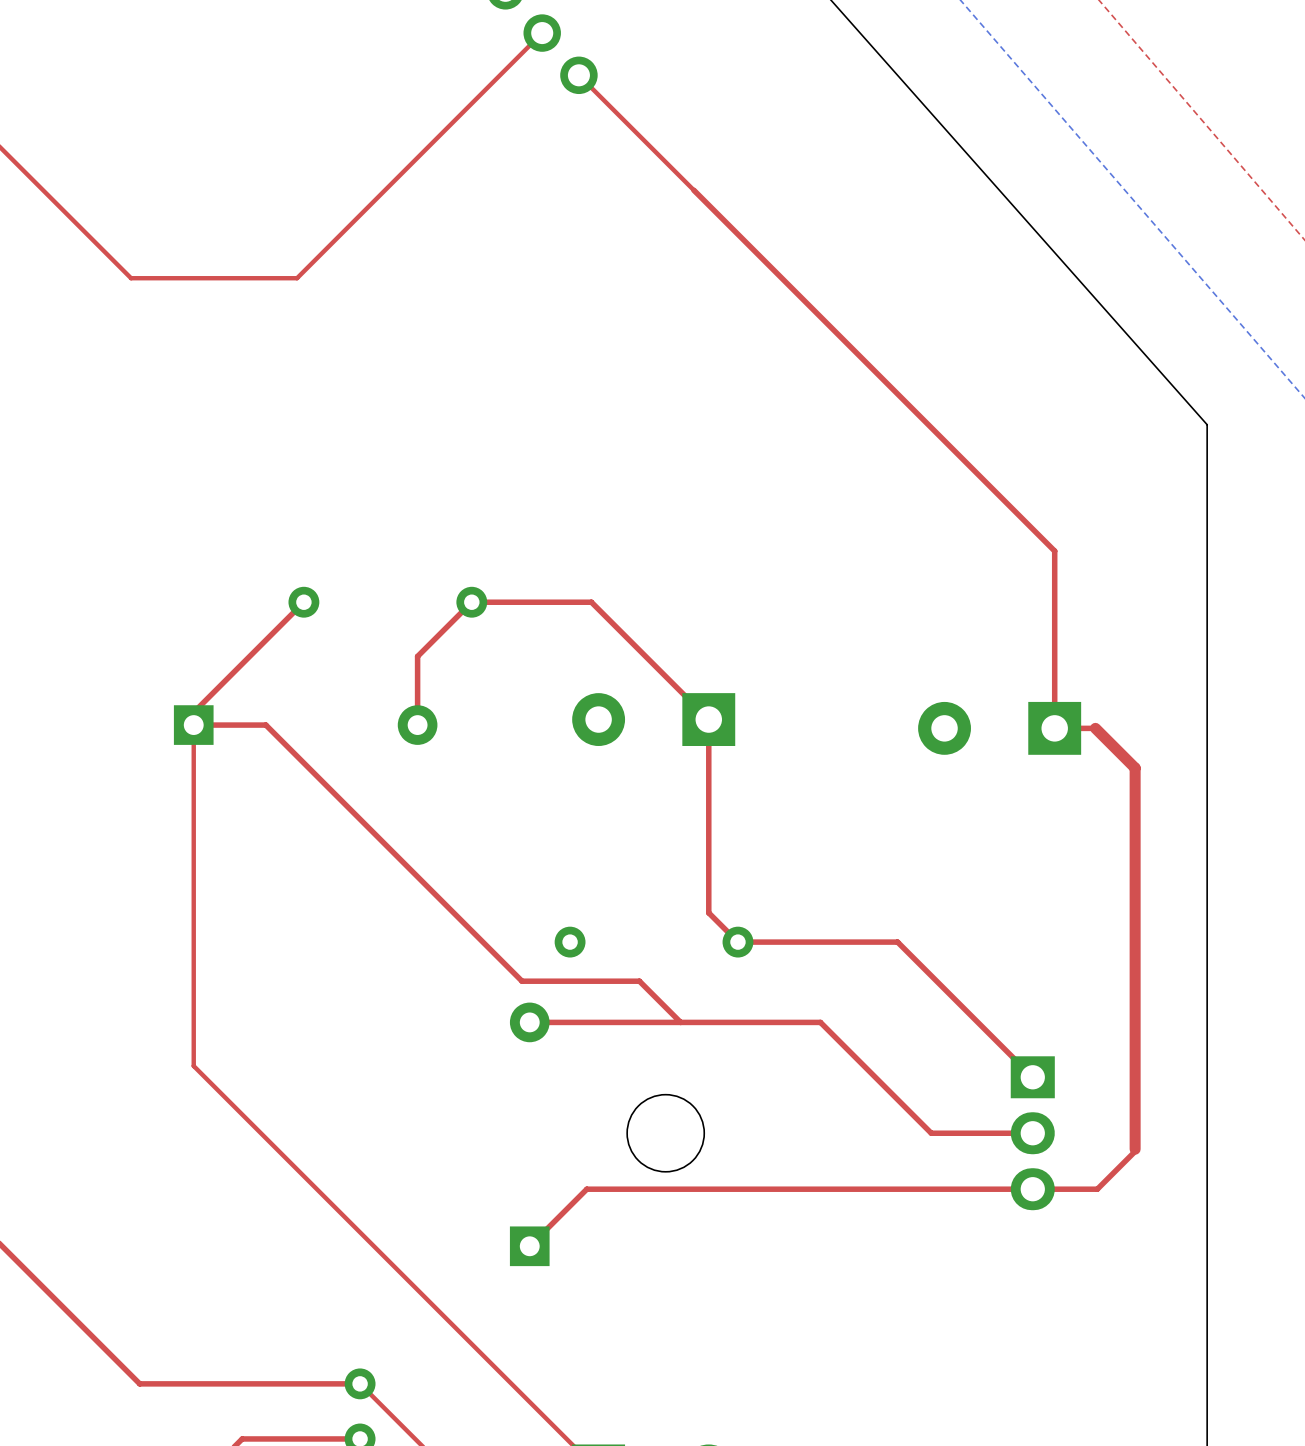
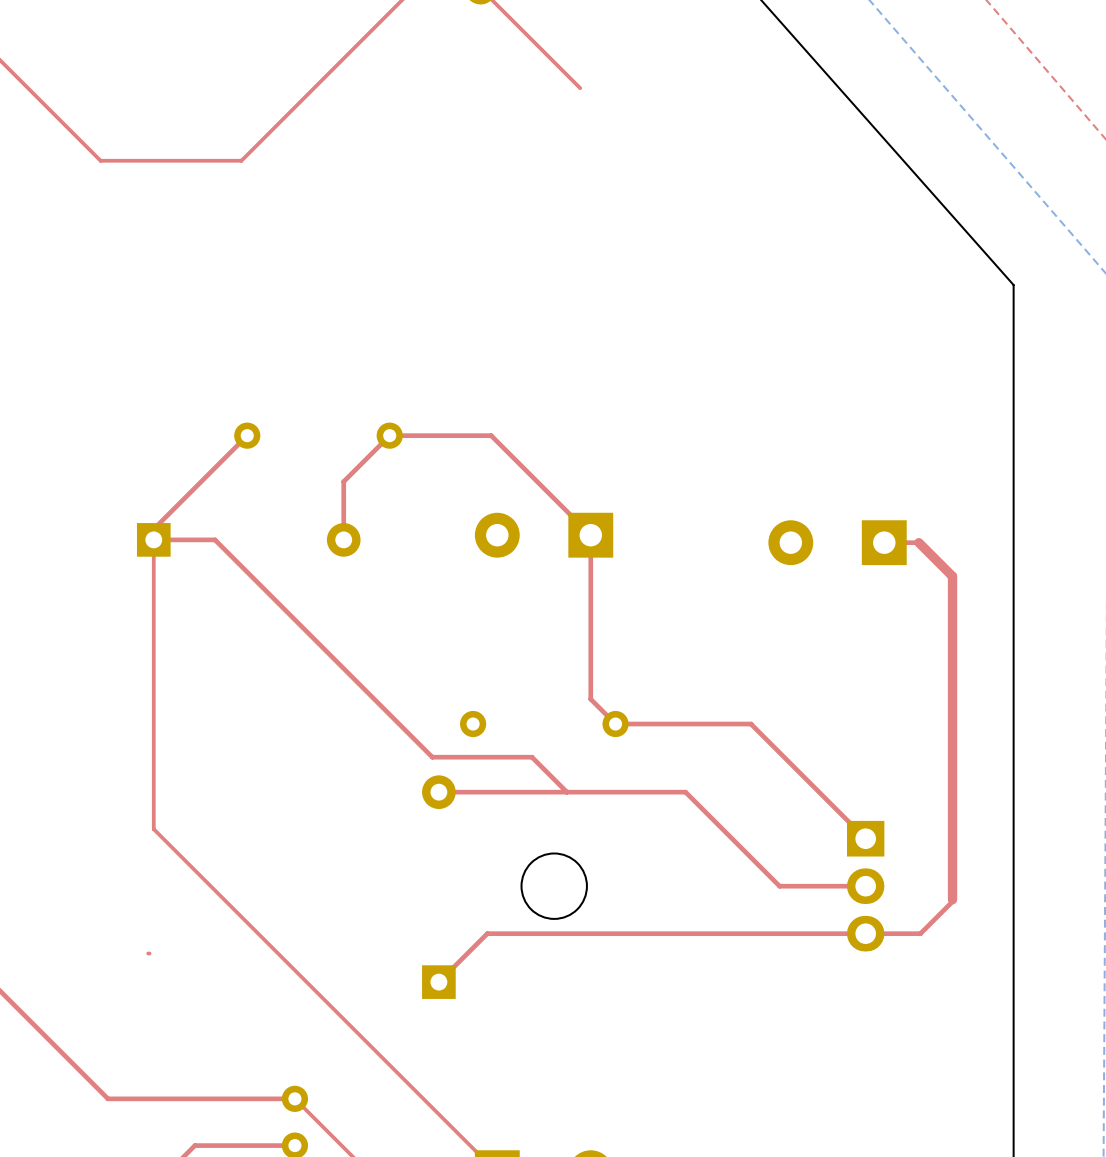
top track: (693, 190) (1054, 551) (1054, 728) -> none
top track: none -> (149, 953) (148, 953)

